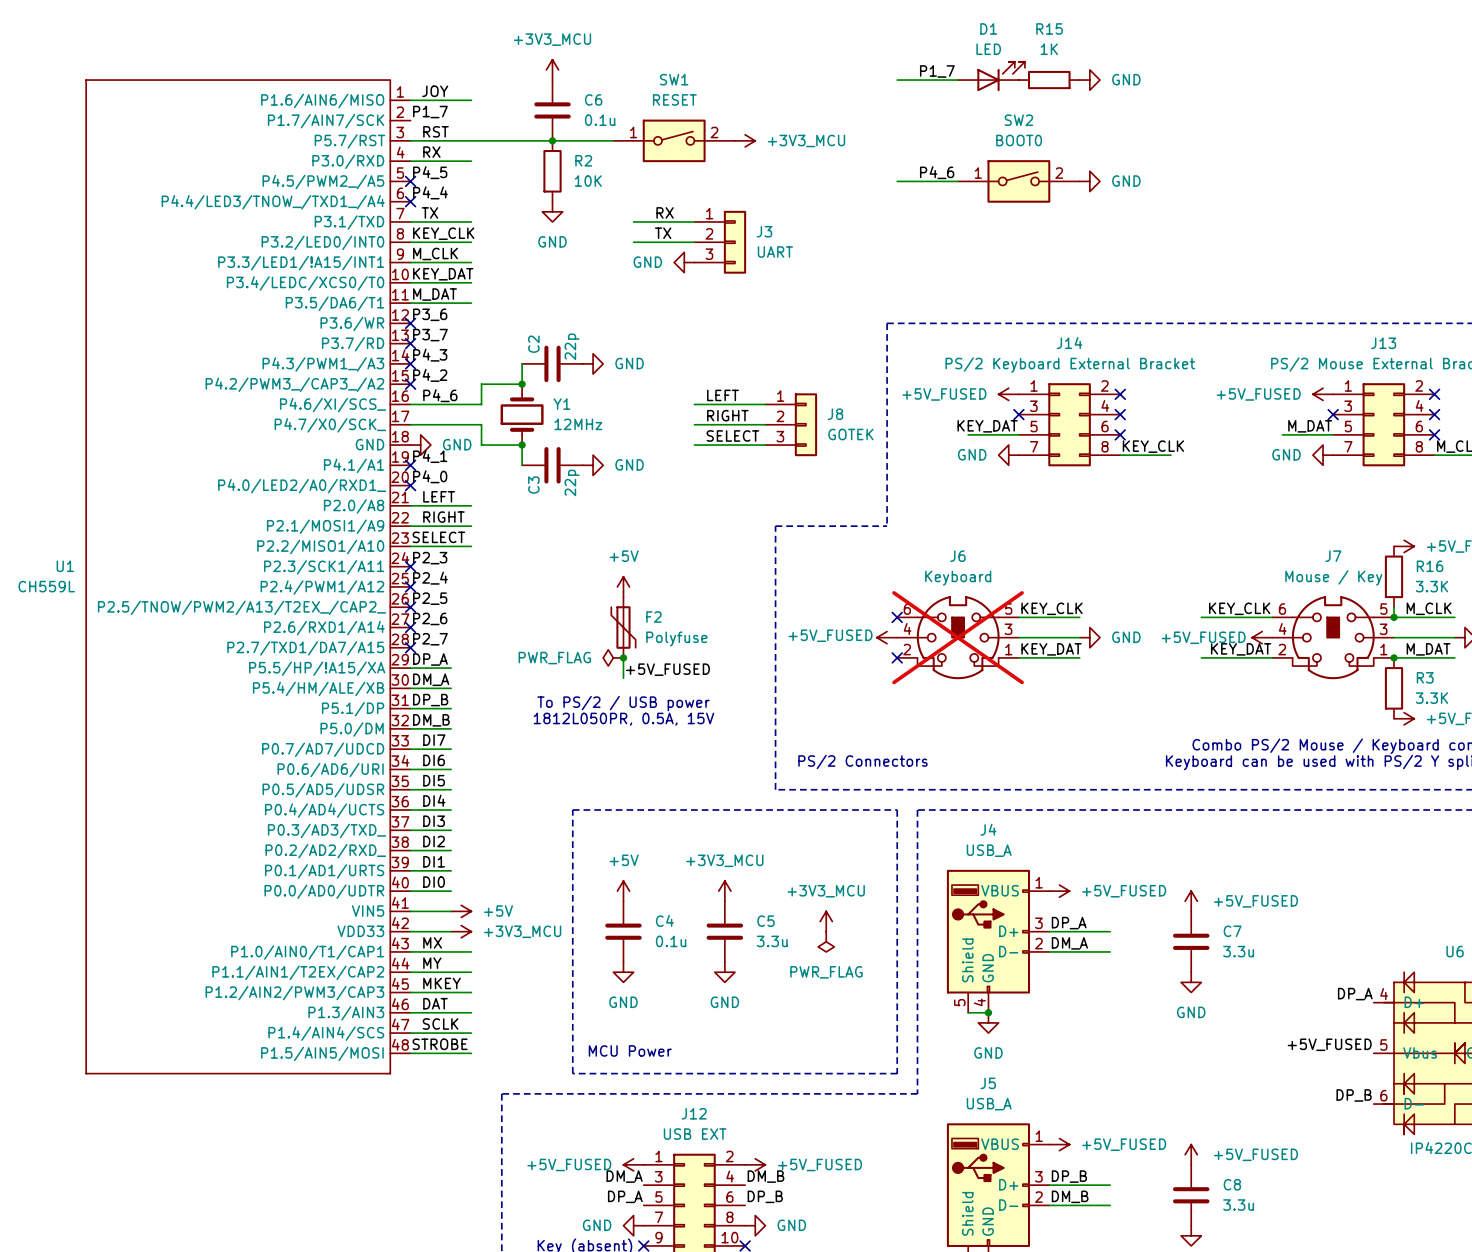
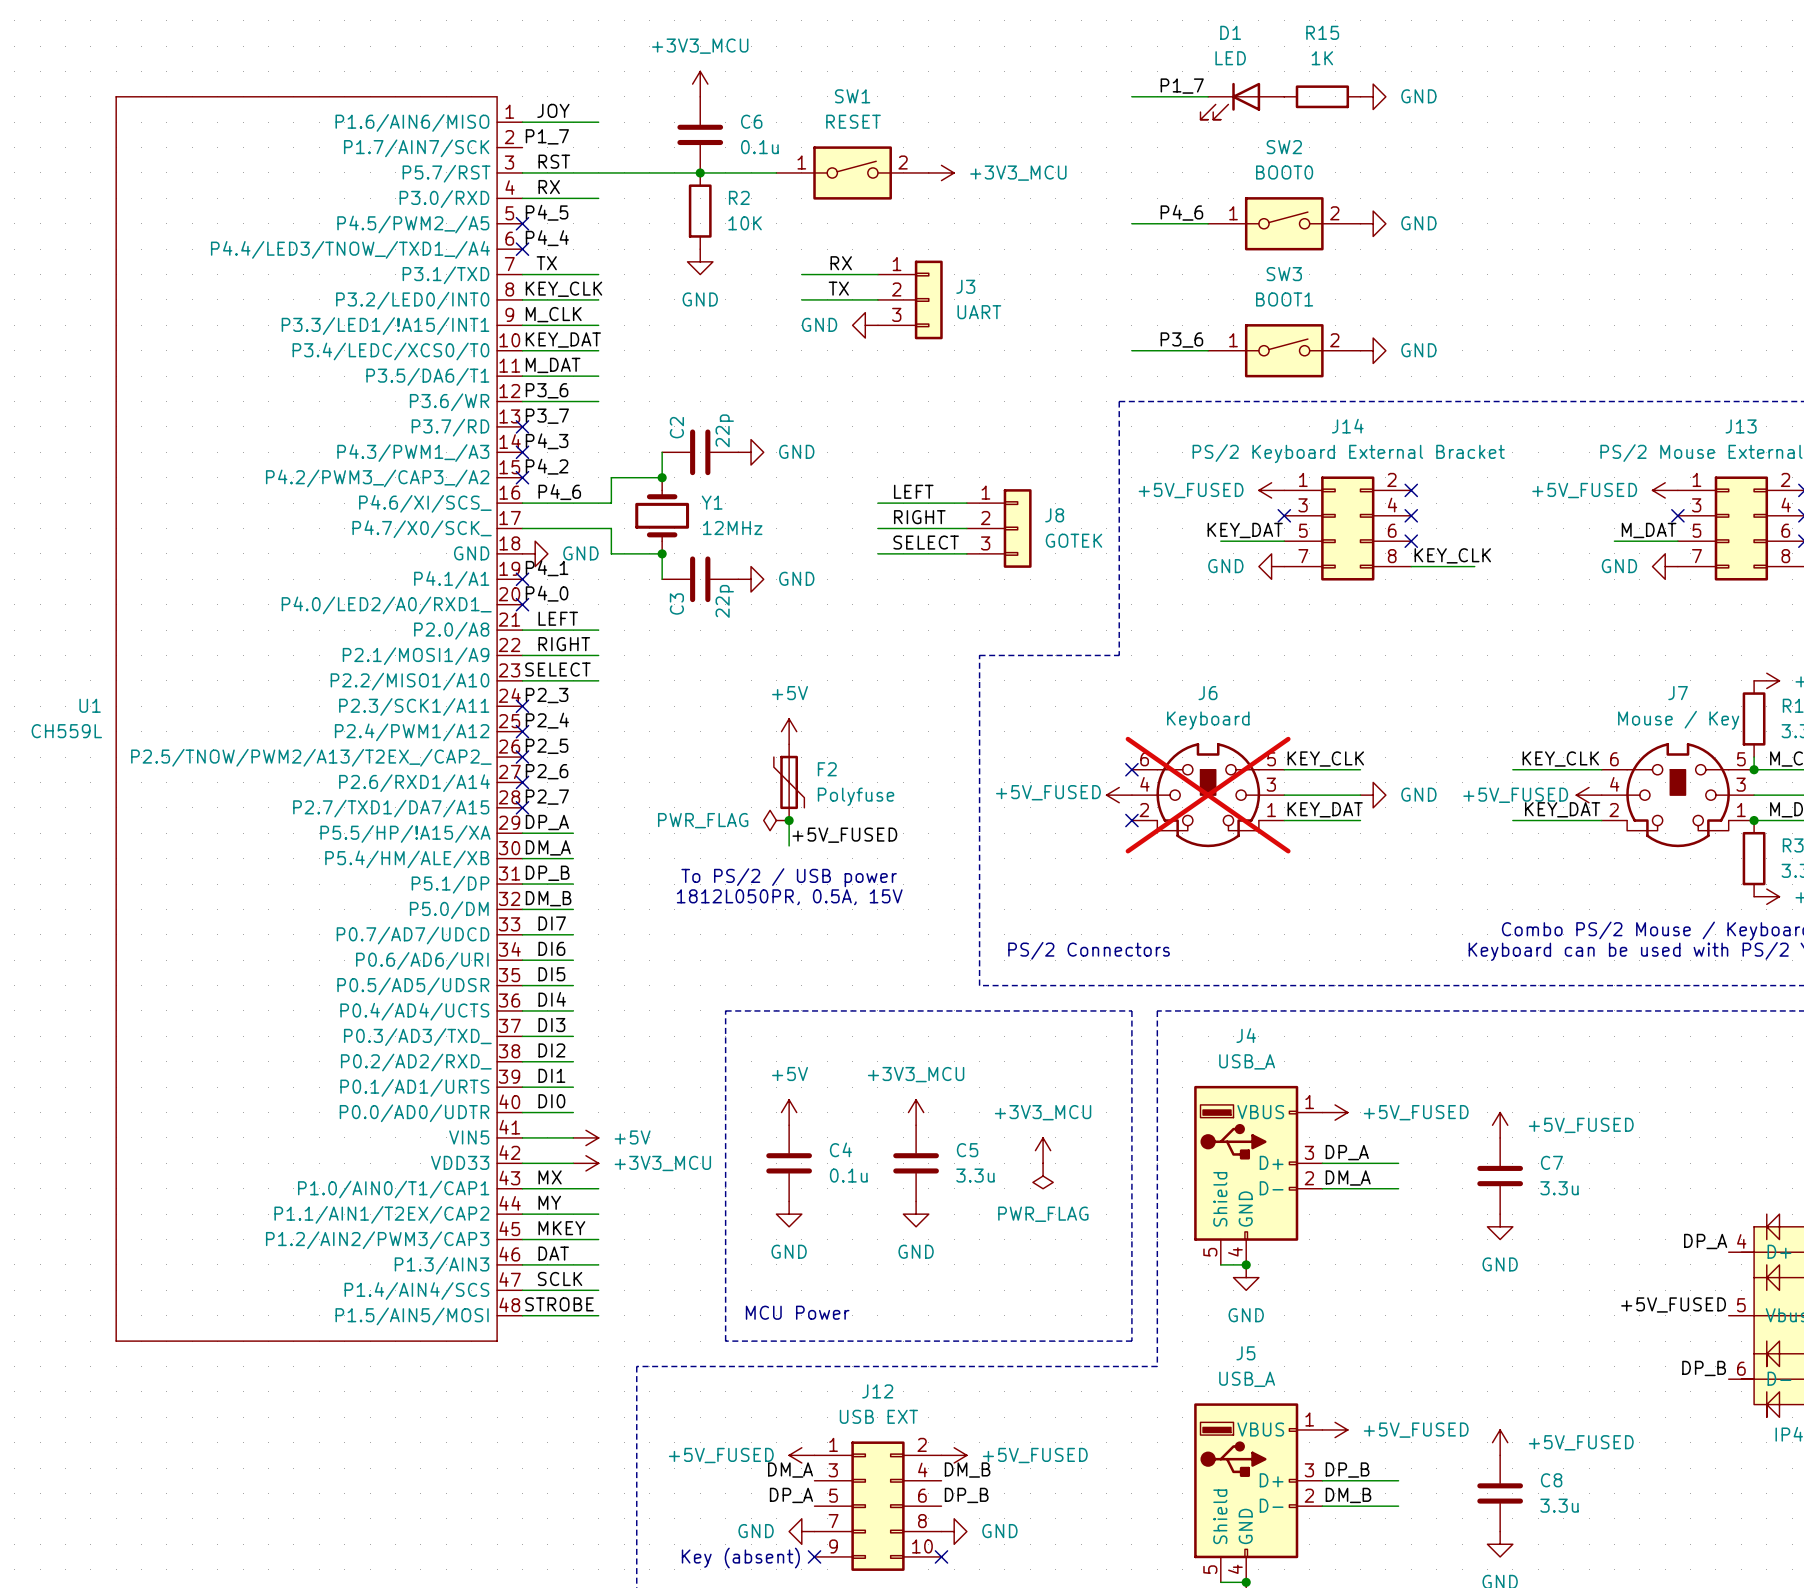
D1 rotation: 0° (1001, 76) -> 180° (1230, 101)
label: none -> P3_6 (1181, 340)
wire: none -> (1131, 350) (1208, 350)
SW3: none -> BOOT1 (1284, 350)
power symbol: none -> GND (1373, 350)
wire: none -> (522, 401) (598, 401)
no-connect mark: (410, 323) -> none

